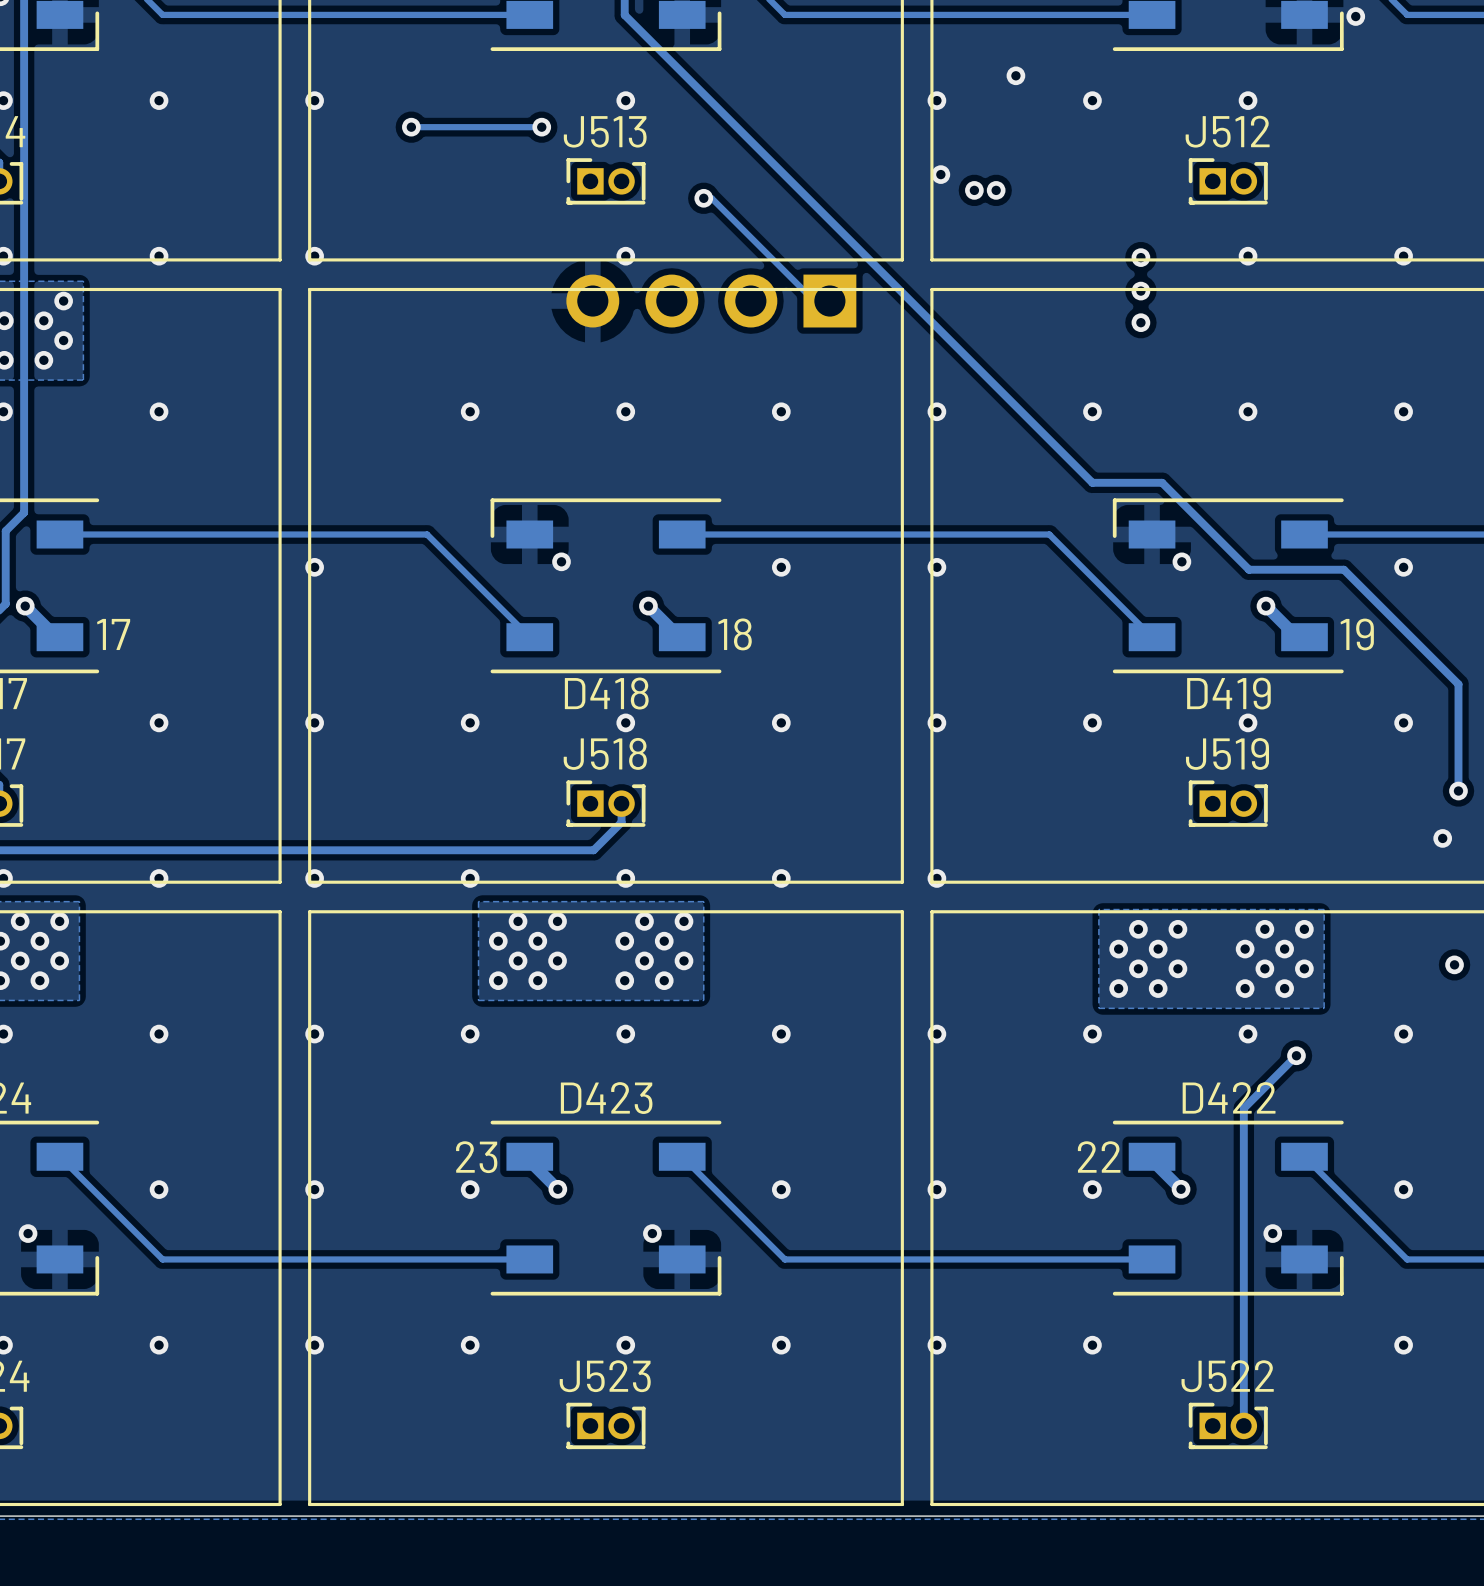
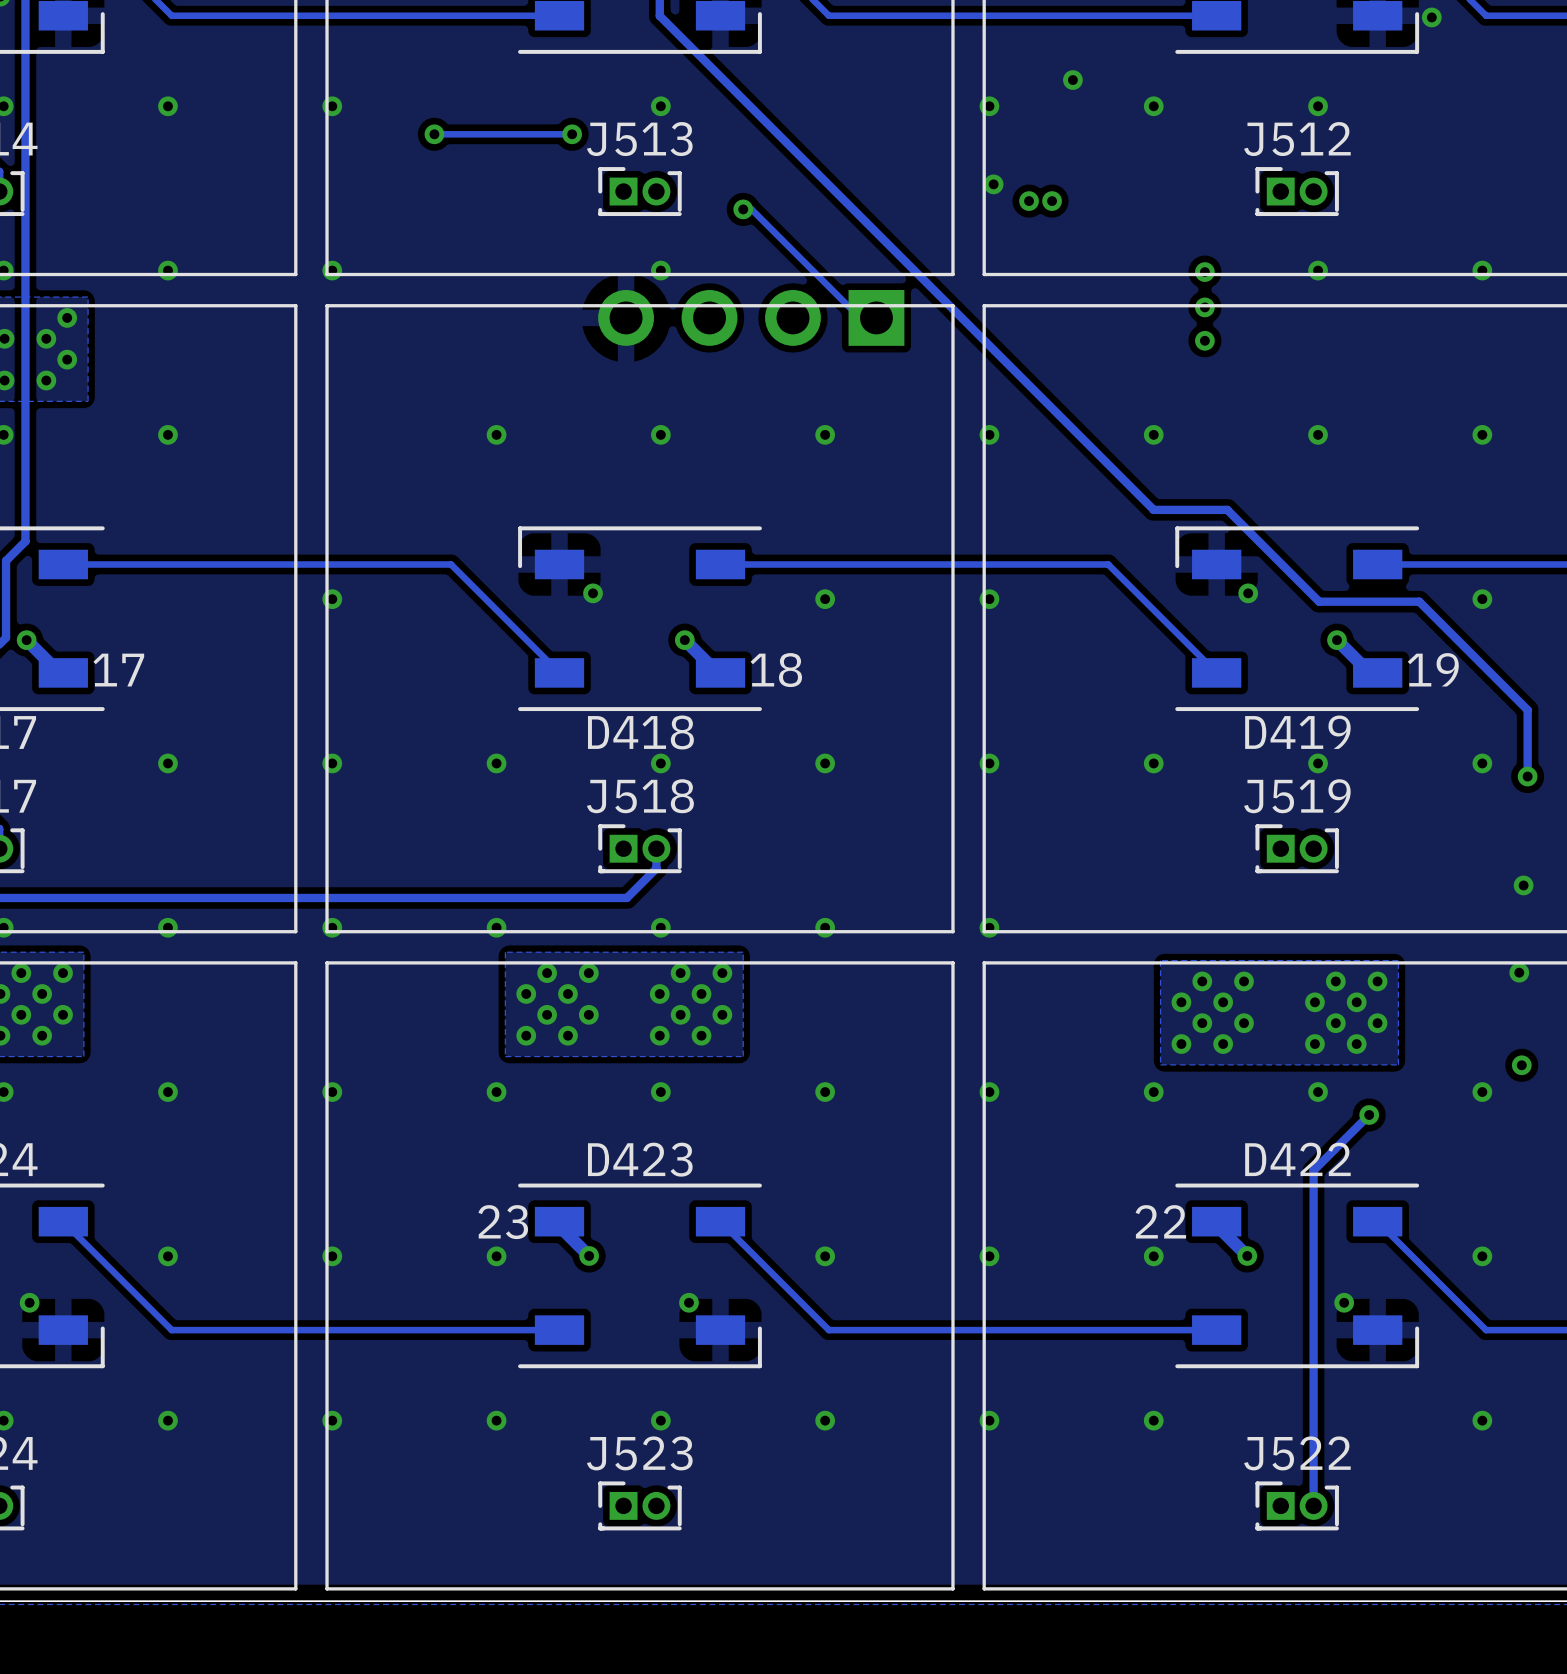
track: (1446, 672) (1458, 684) (1458, 791) -> (1527, 710) (1527, 776)
via: none -> (1527, 776)
via: (1458, 791) -> none
via: none -> (1519, 972)
via: (1454, 964) -> none
via: none -> (1521, 1065)

